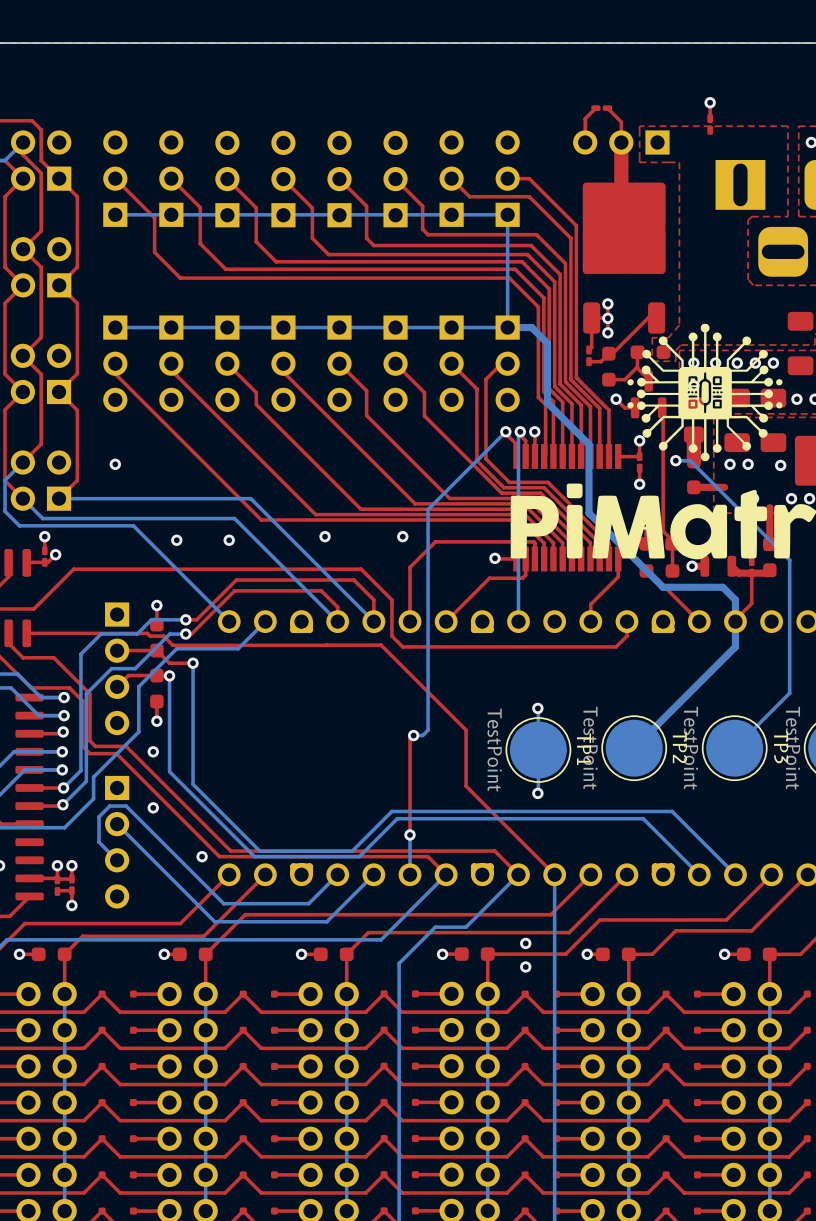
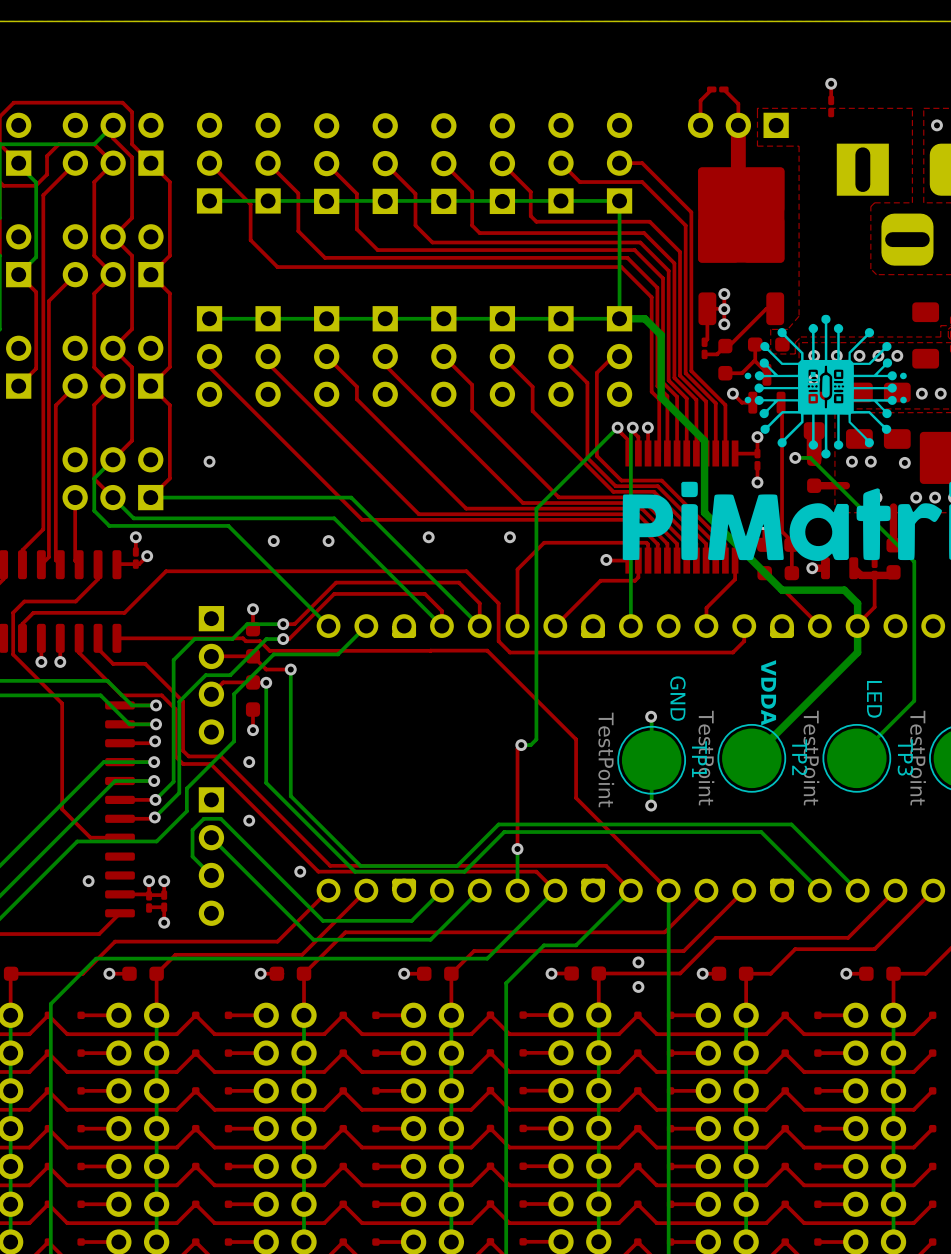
text: none -> VDDA (768, 692)
text: none -> GND (677, 698)
text: none -> LED (874, 699)

